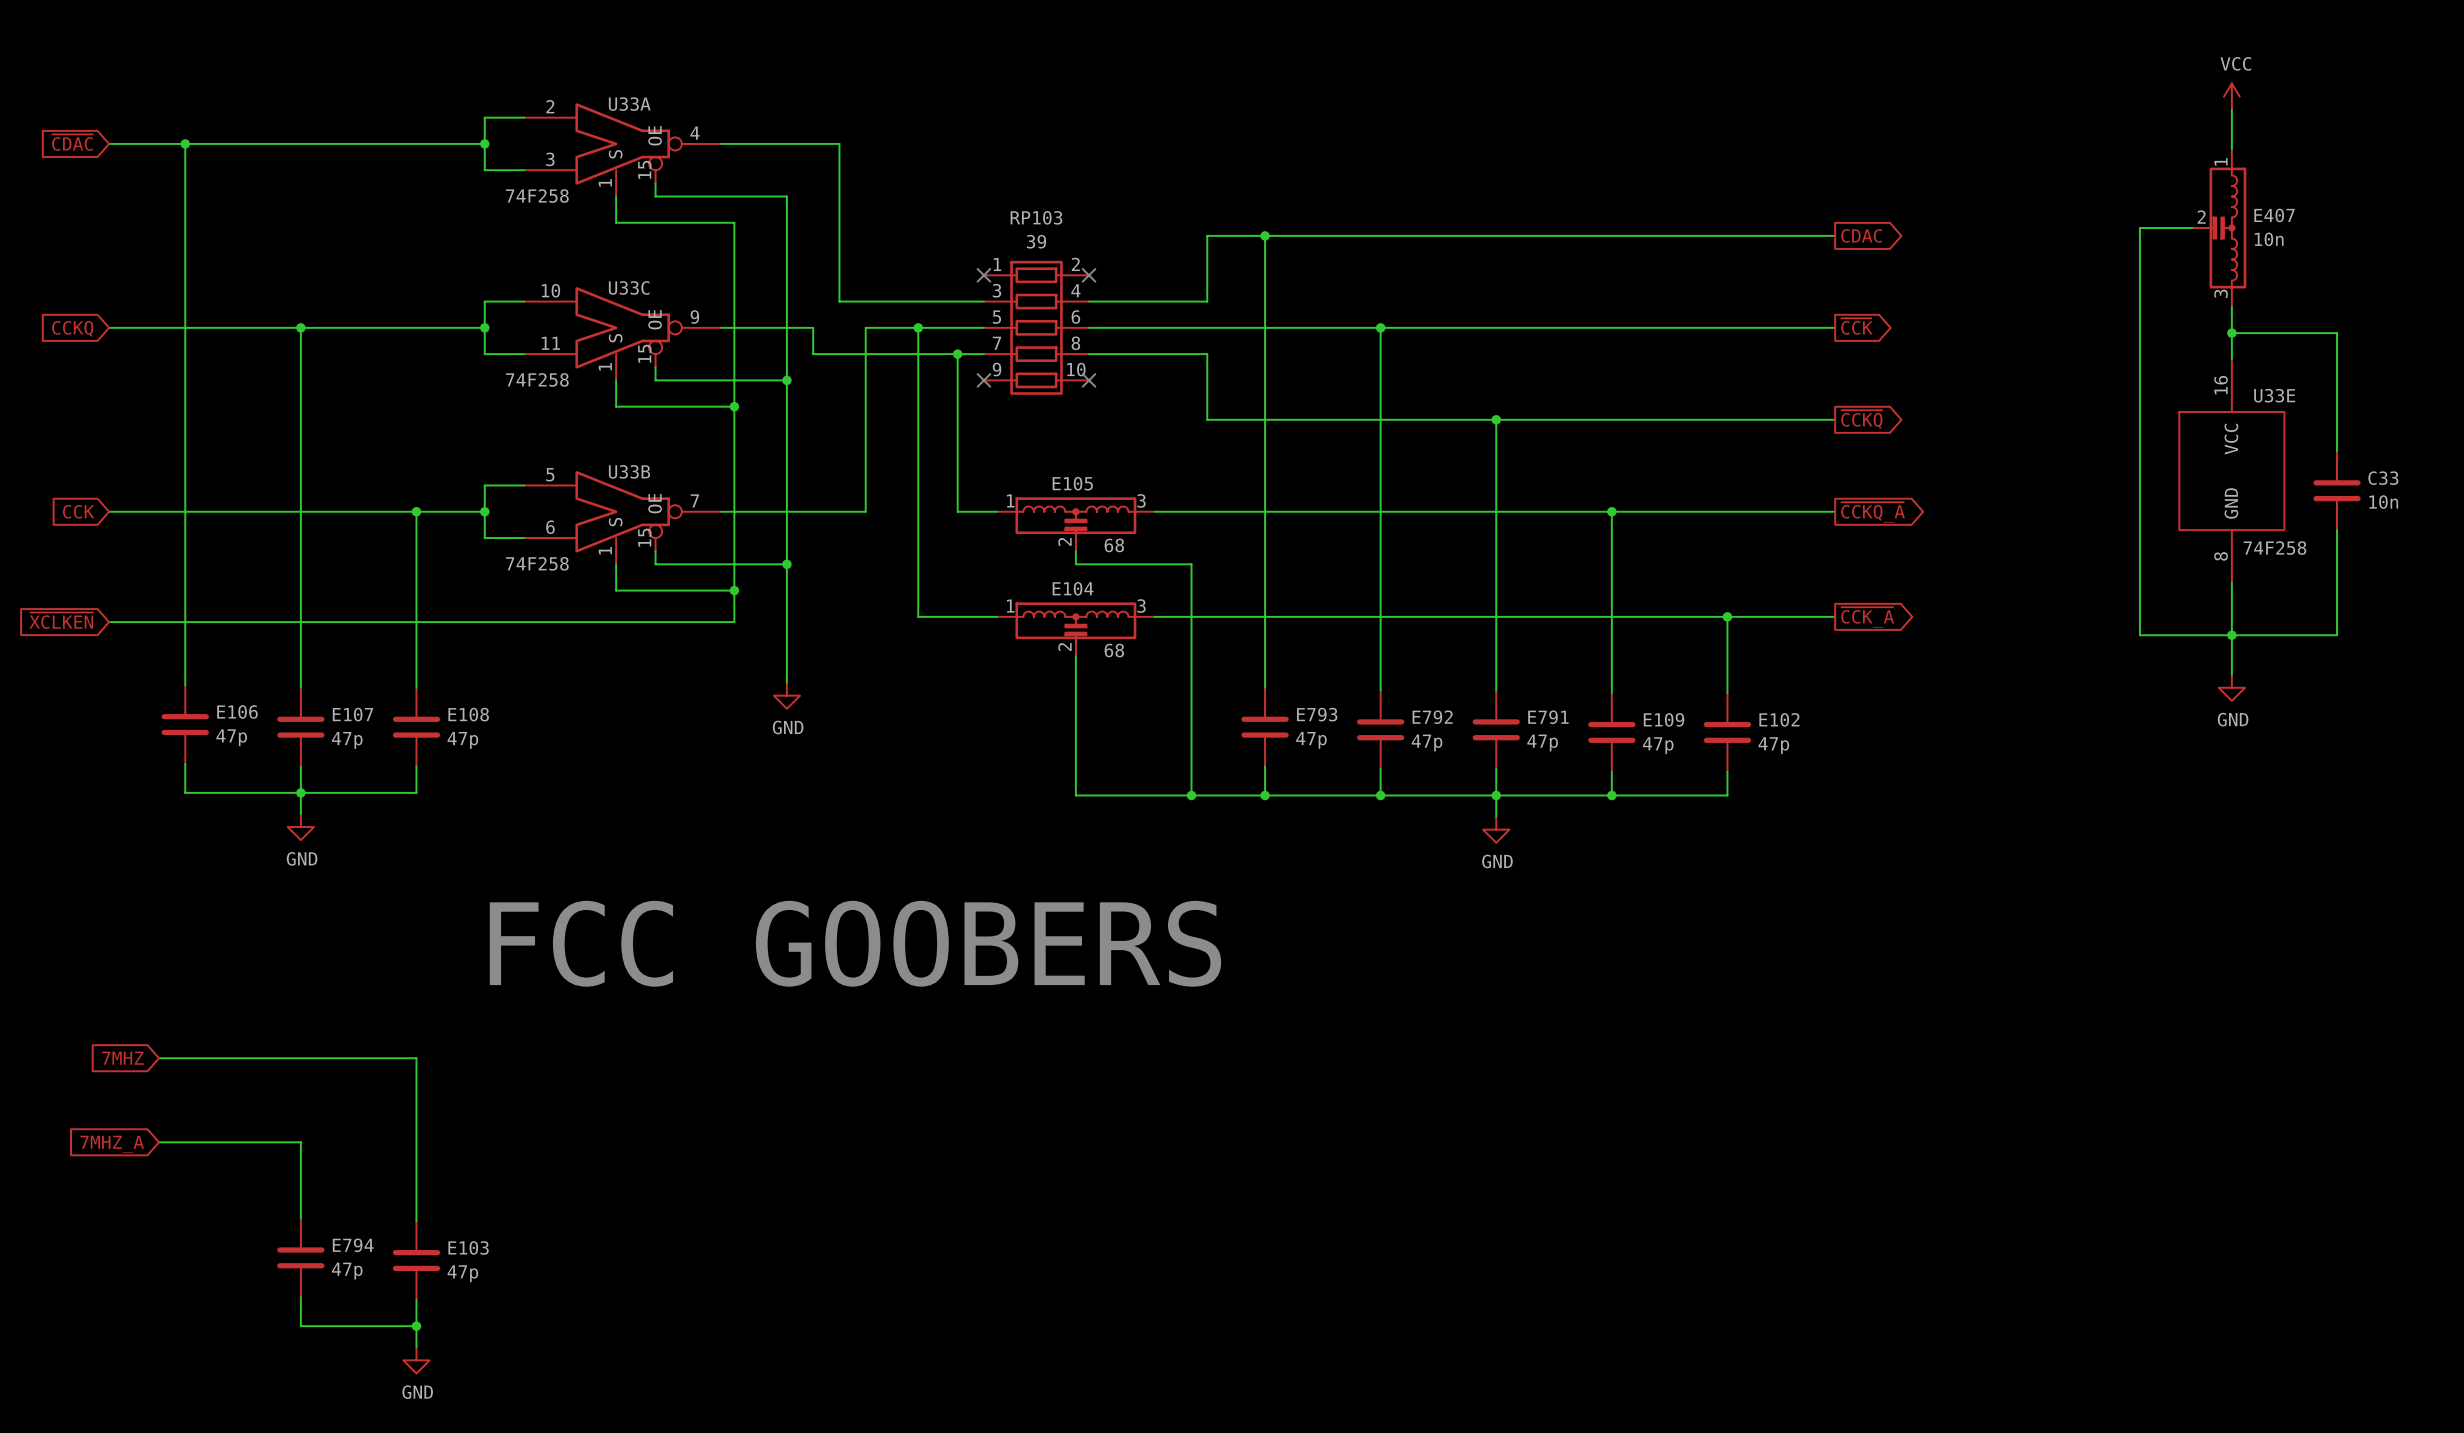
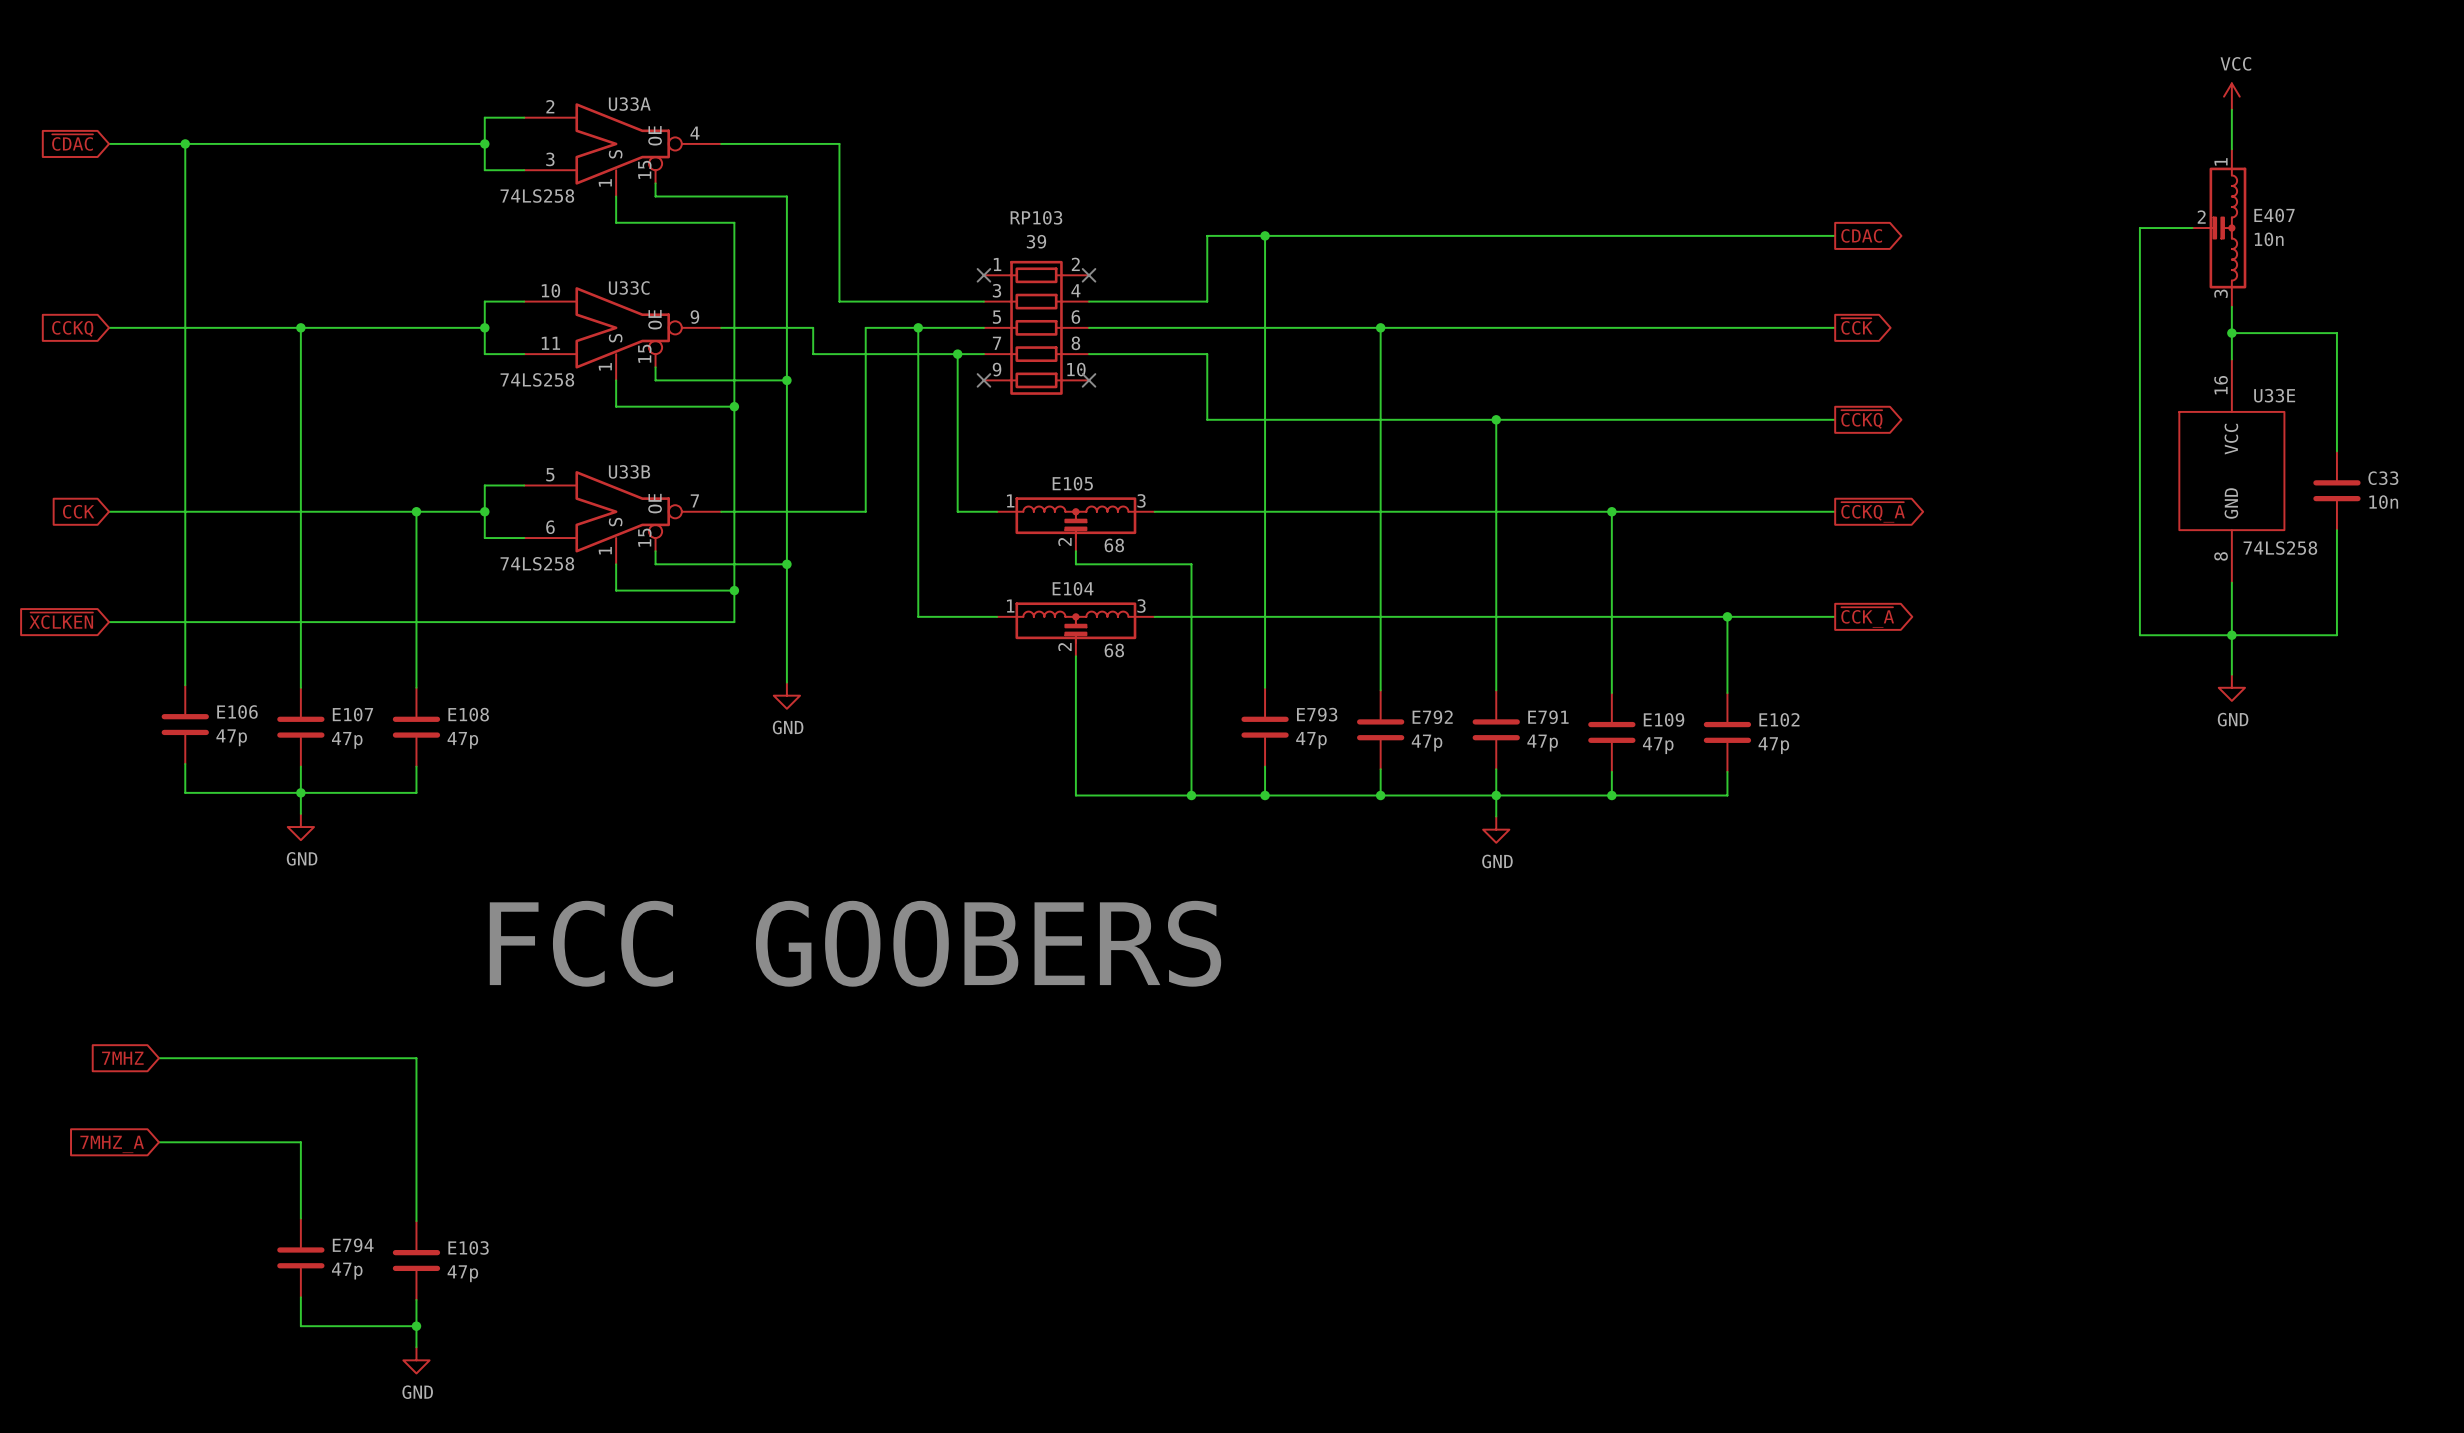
U33A value: 74F258 (537, 196) -> 74LS258 (537, 196)
U33C value: 74F258 (537, 379) -> 74LS258 (537, 379)
U33E value: 74F258 (2274, 548) -> 74LS258 (2280, 548)
U33B value: 74F258 (537, 563) -> 74LS258 (537, 563)

